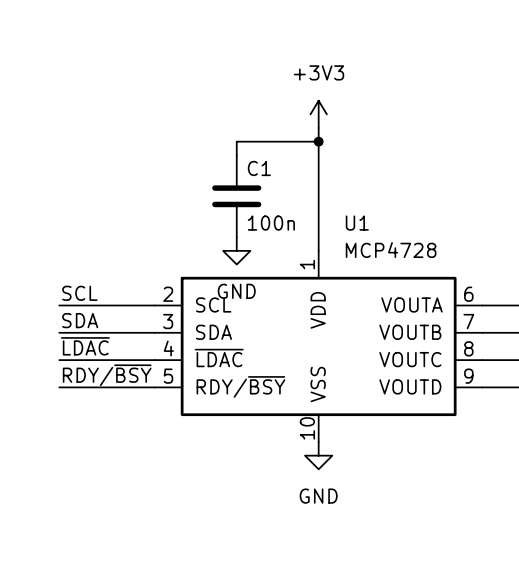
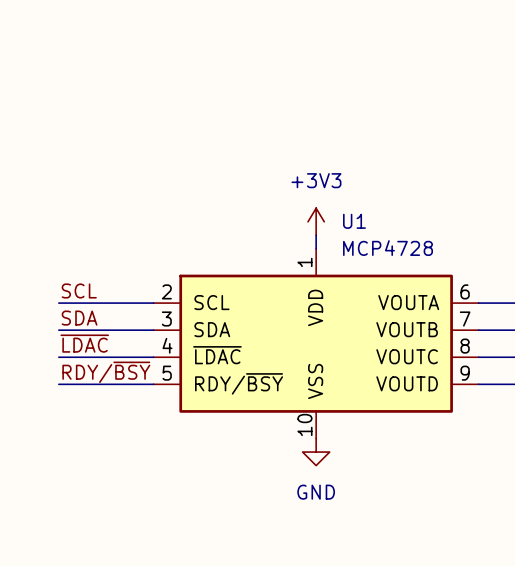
power symbol position: +3V3 (318, 114) -> +3V3 (316, 221)
wire: (318, 128) (318, 237) -> none
wire: (318, 141) (236, 141) (236, 155) -> none
junction: (318, 141) -> none
C1: 100n (236, 196) -> none
power symbol: GND (236, 250) -> none

